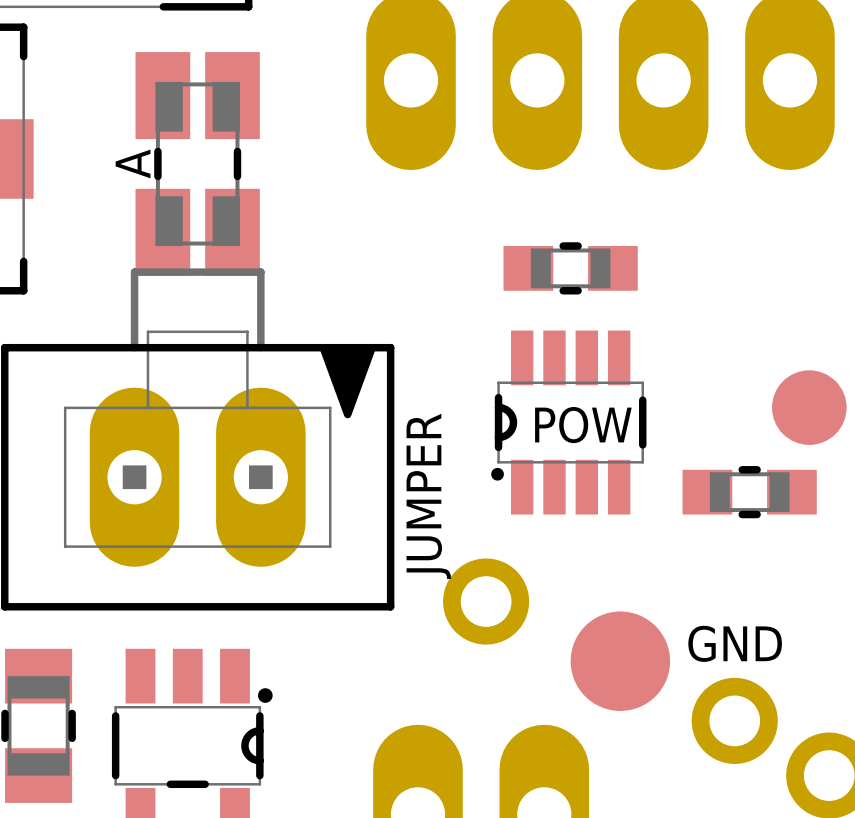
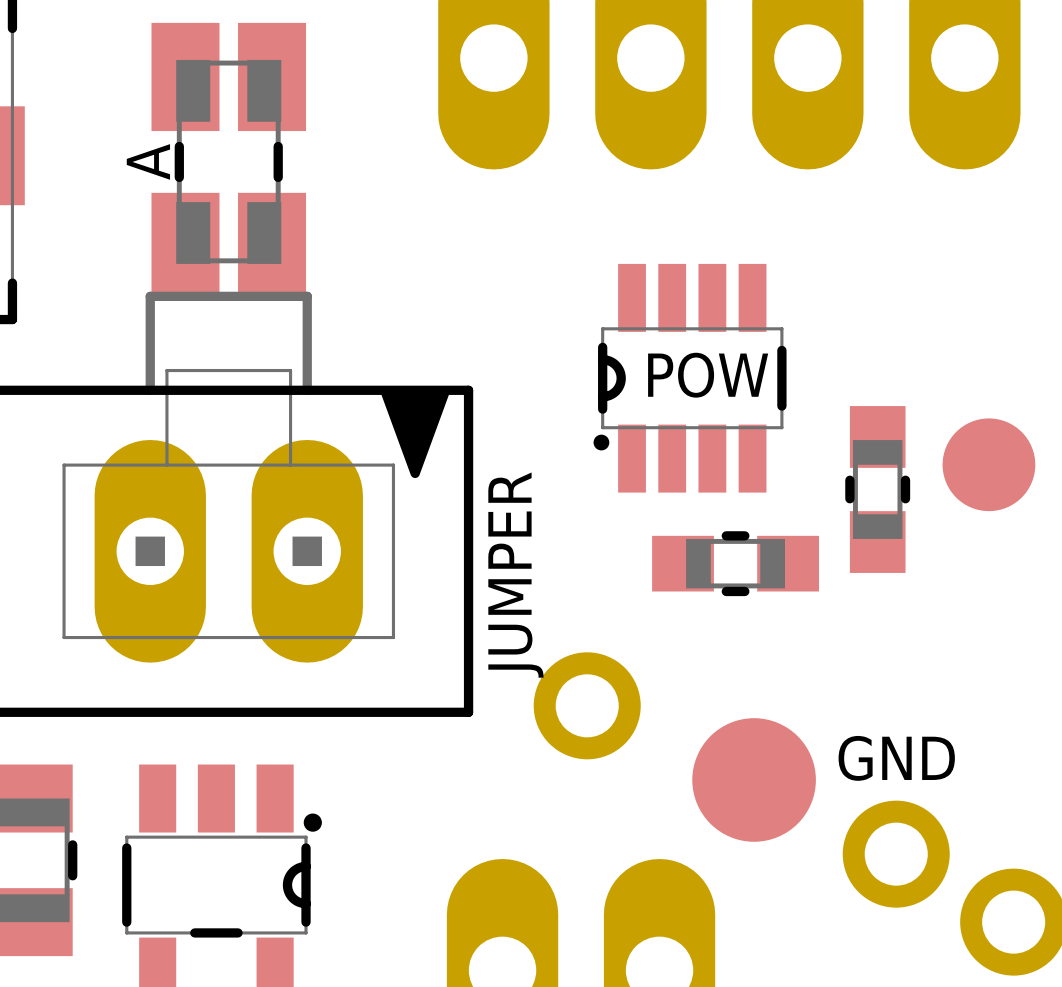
part: (570, 268) -> none
part position: (568, 422) -> (690, 378)
text position: POW (583, 425) -> POW (708, 375)
part: none -> (735, 563)
part rotation: 0° (749, 492) -> 90° clockwise (877, 489)

